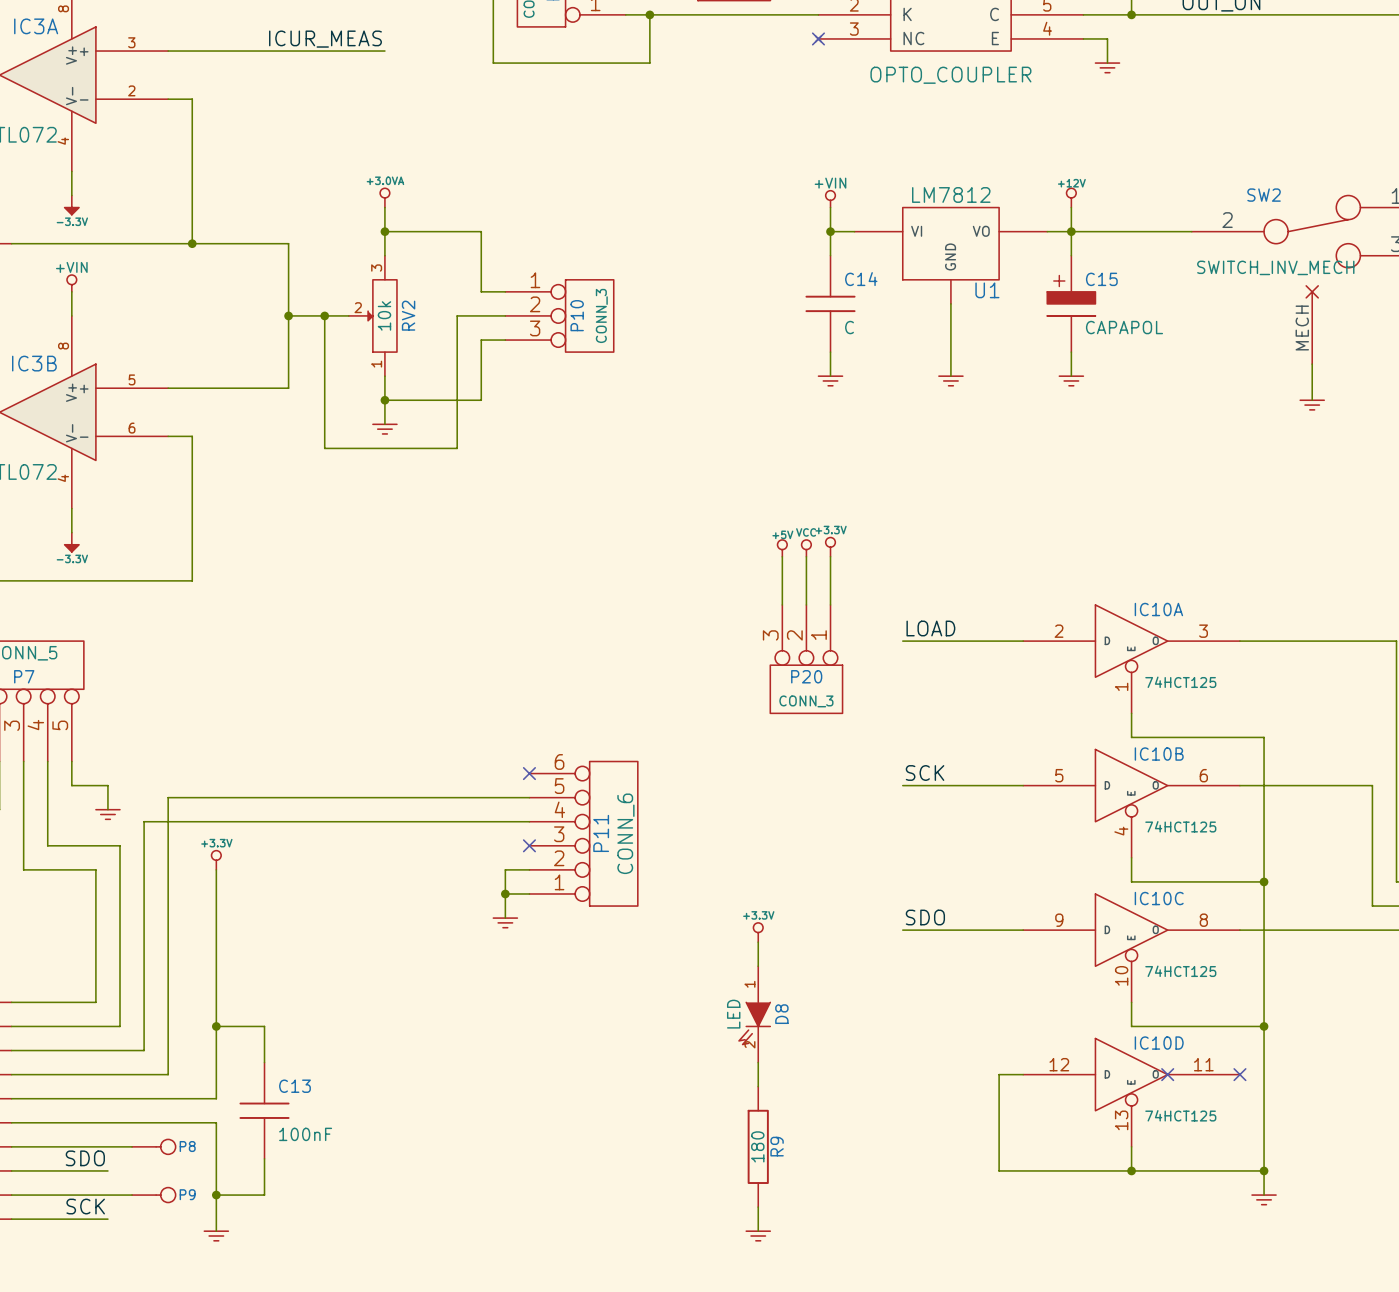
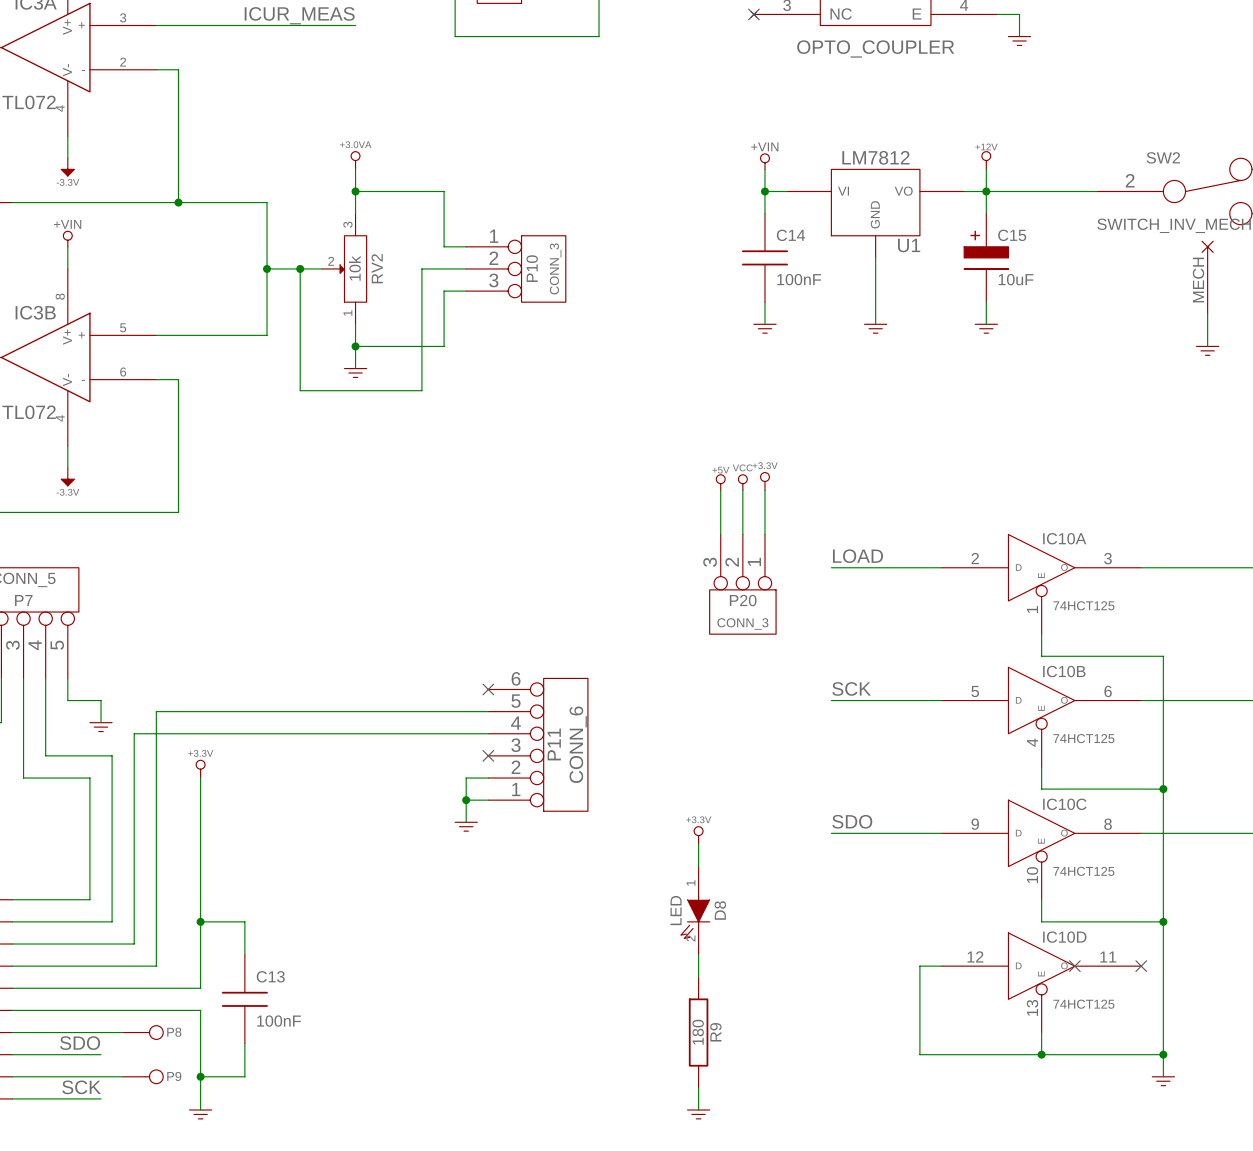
C14 value: C (849, 327) -> 100nF (799, 279)
C15 value: CAPAPOL (1124, 327) -> 10uF (1016, 279)

